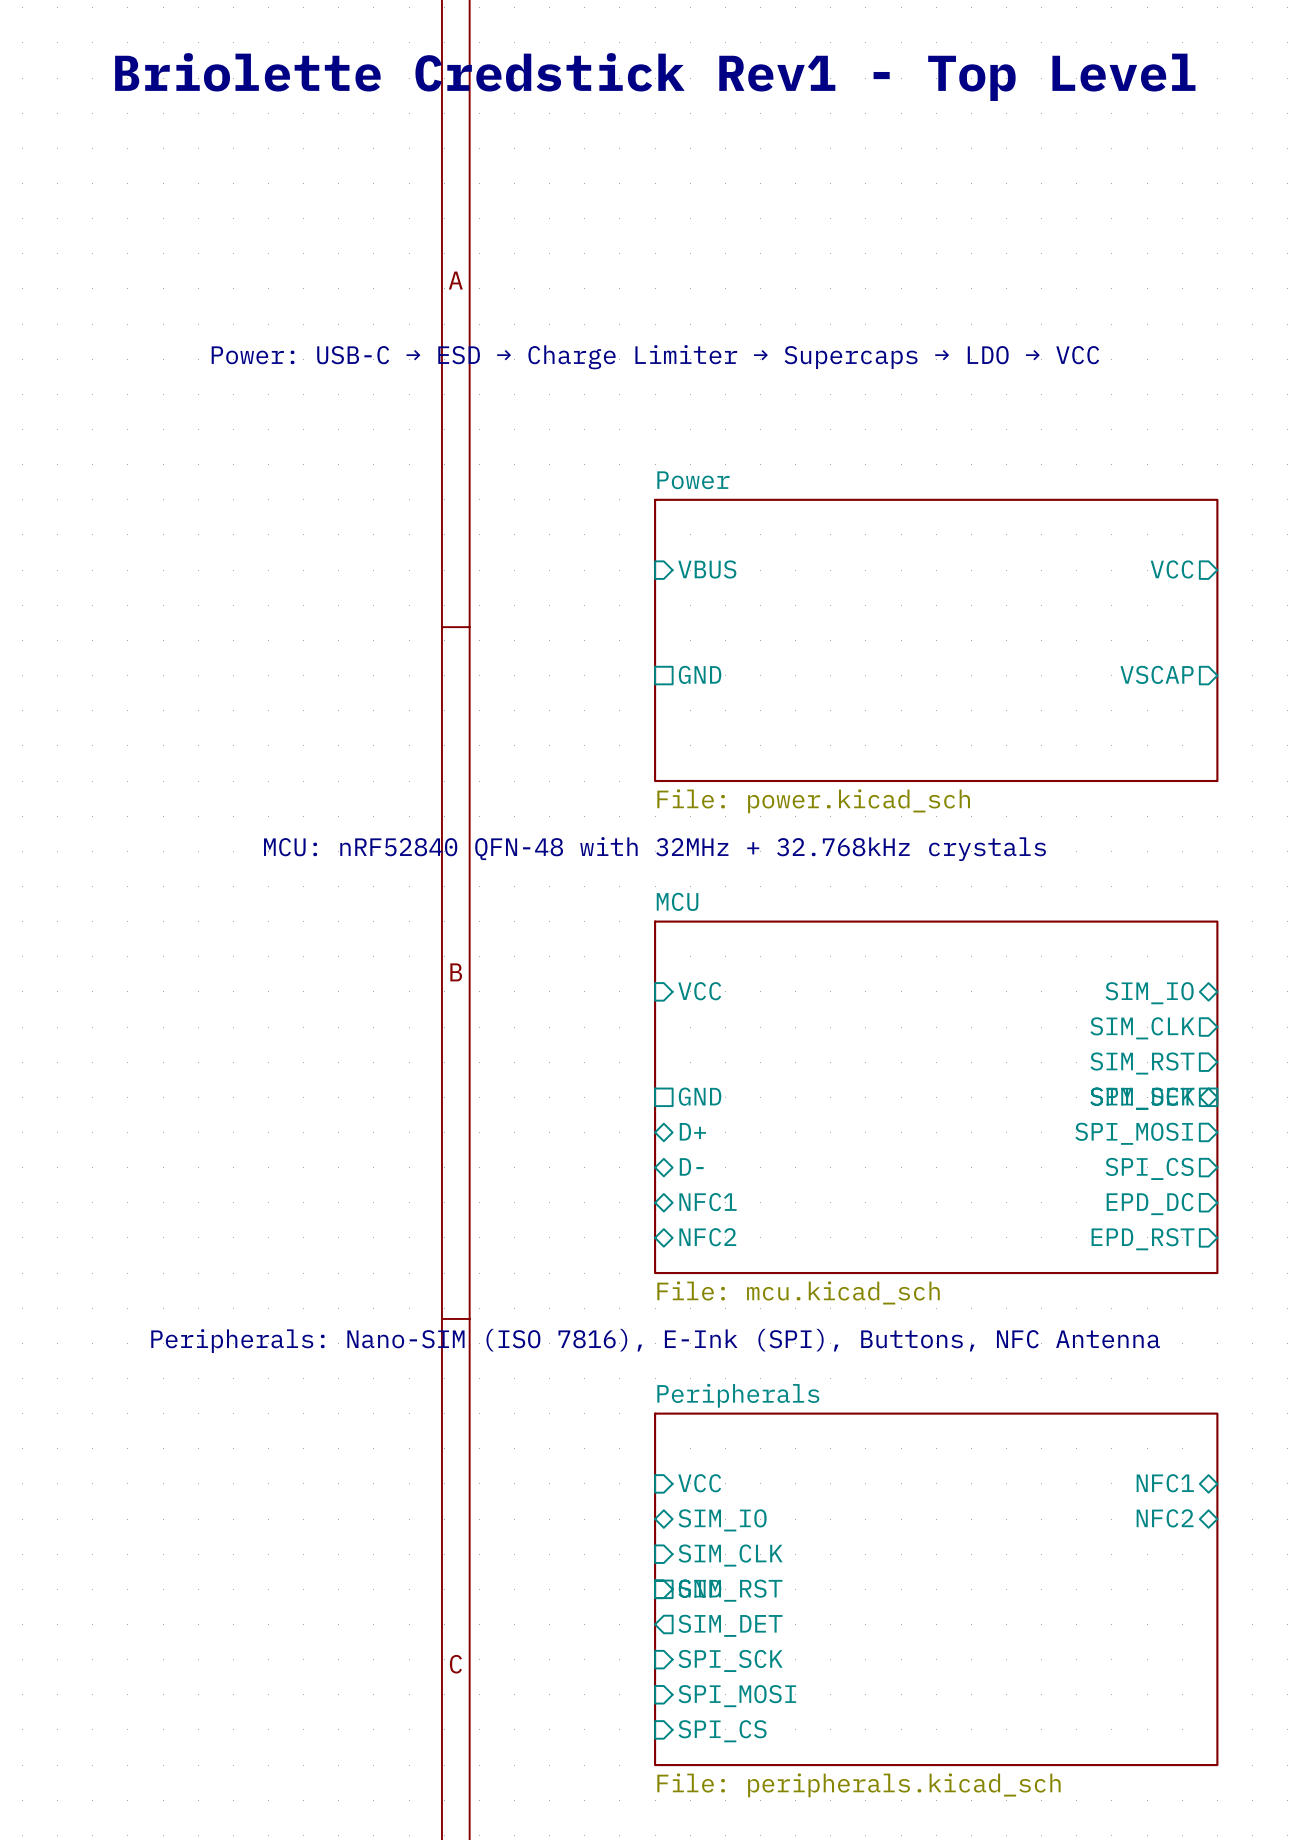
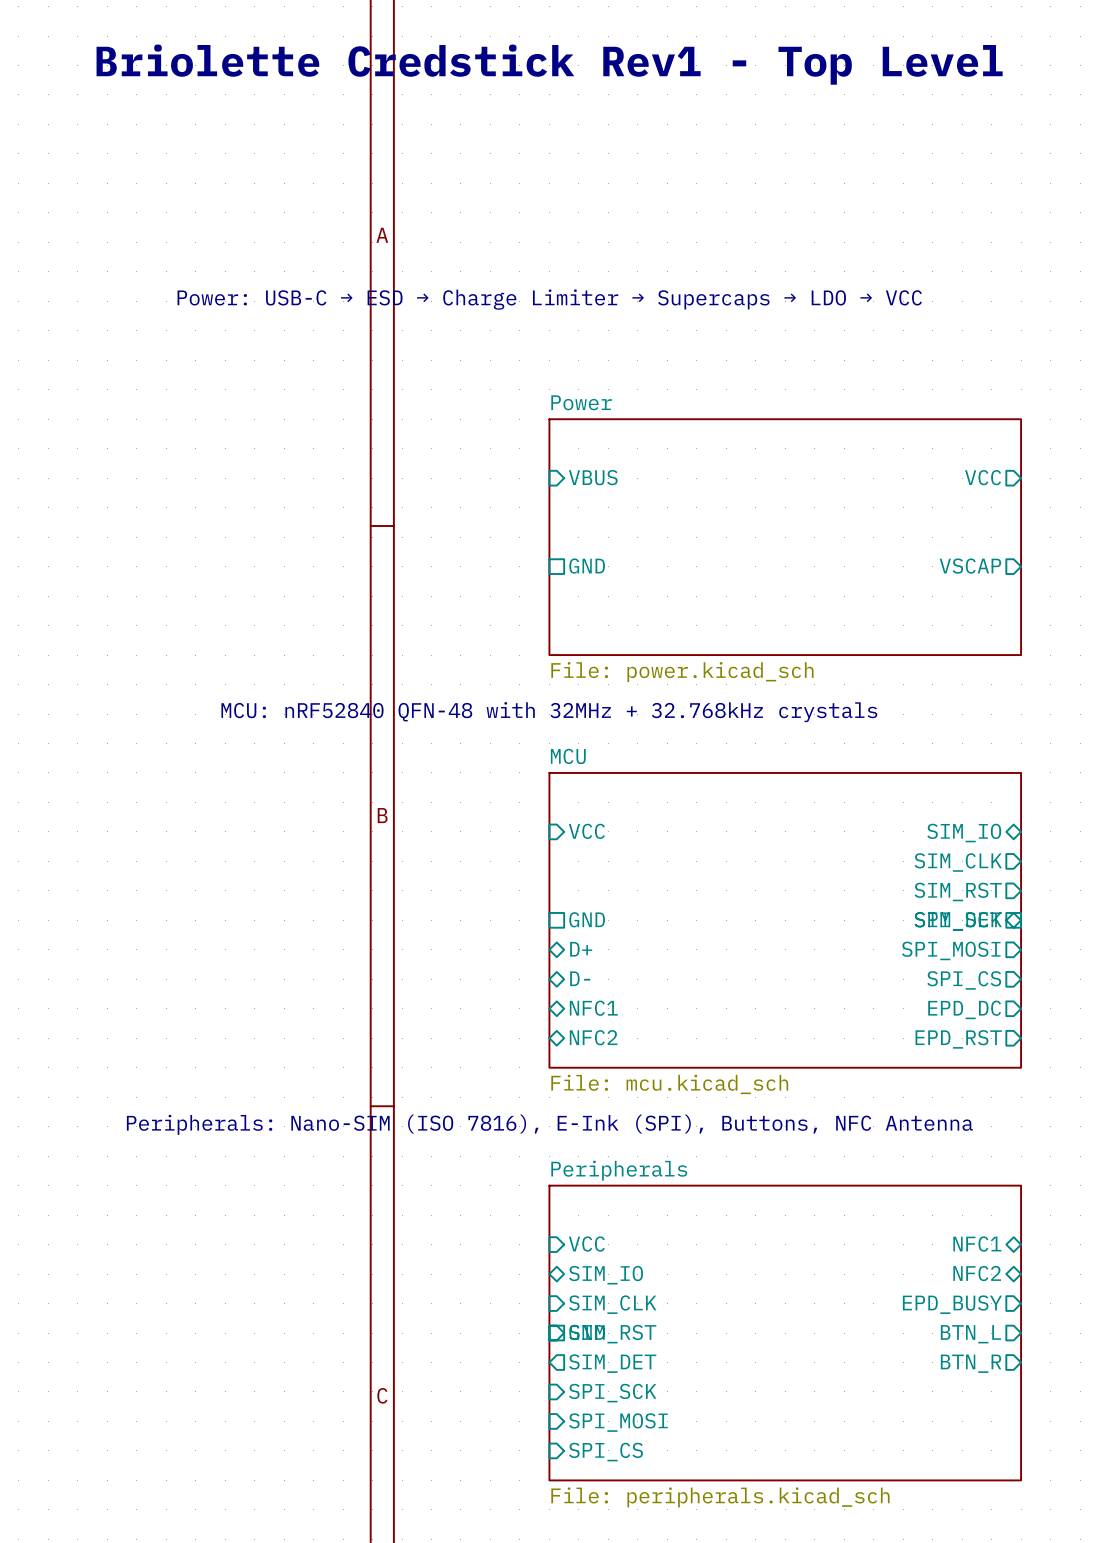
sheet pin: none -> EPD_BUSY (952, 1304)
sheet pin: none -> BTN_L (970, 1334)
sheet pin: none -> BTN_R (971, 1363)

